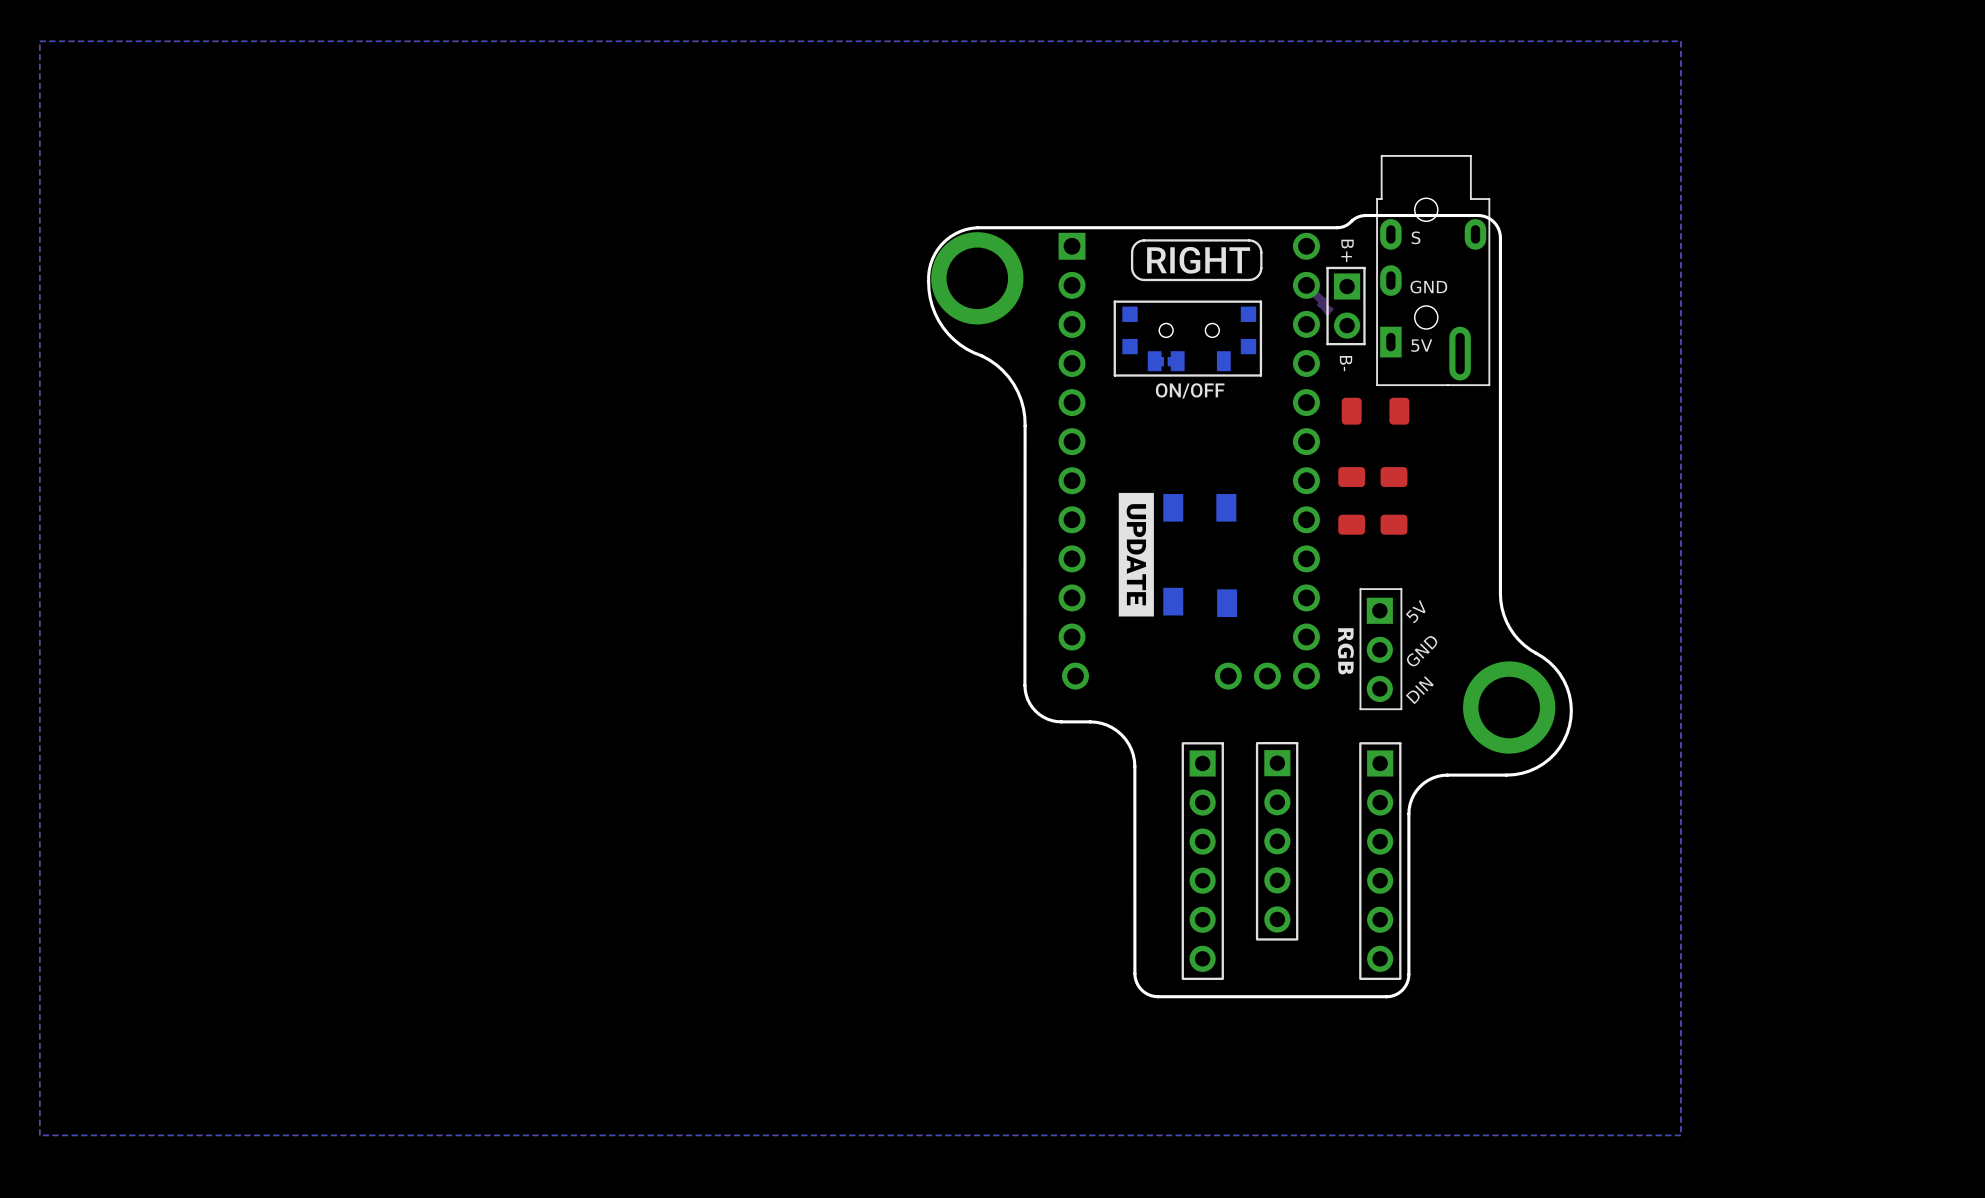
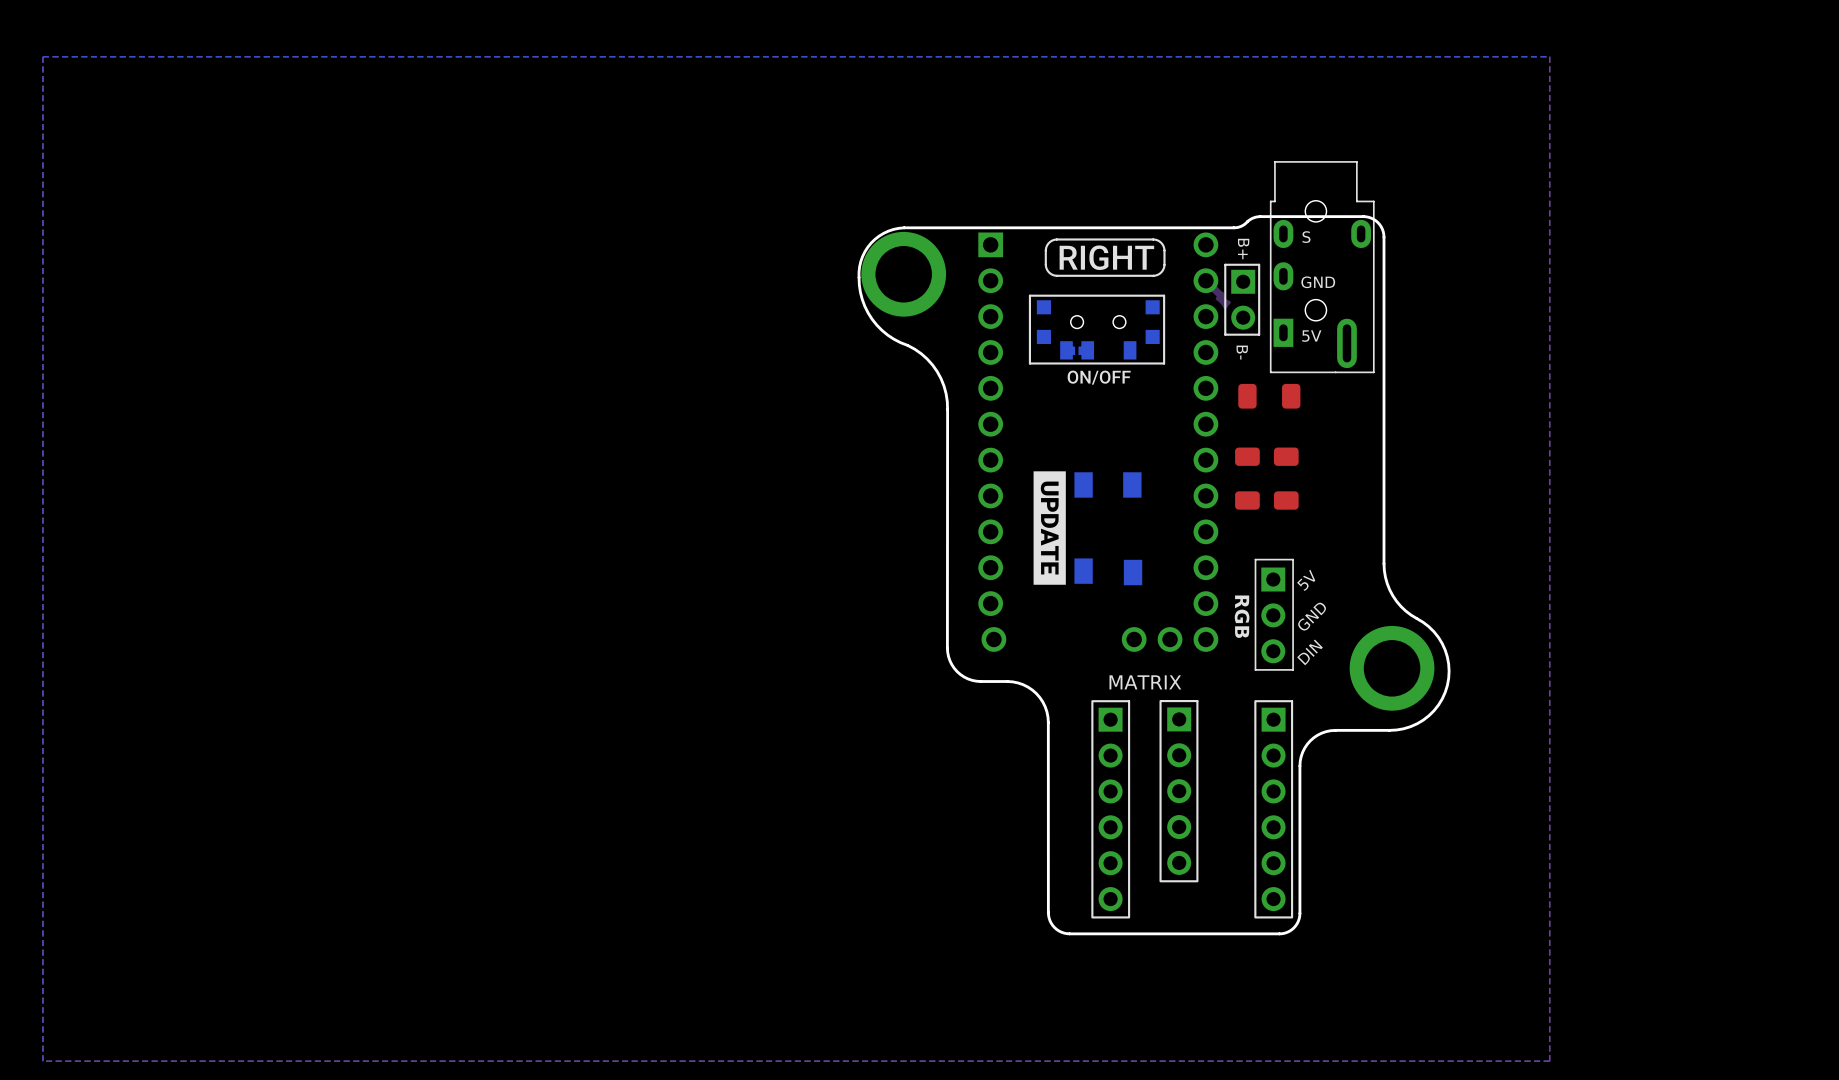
text: none -> MATRIX (1145, 682)

